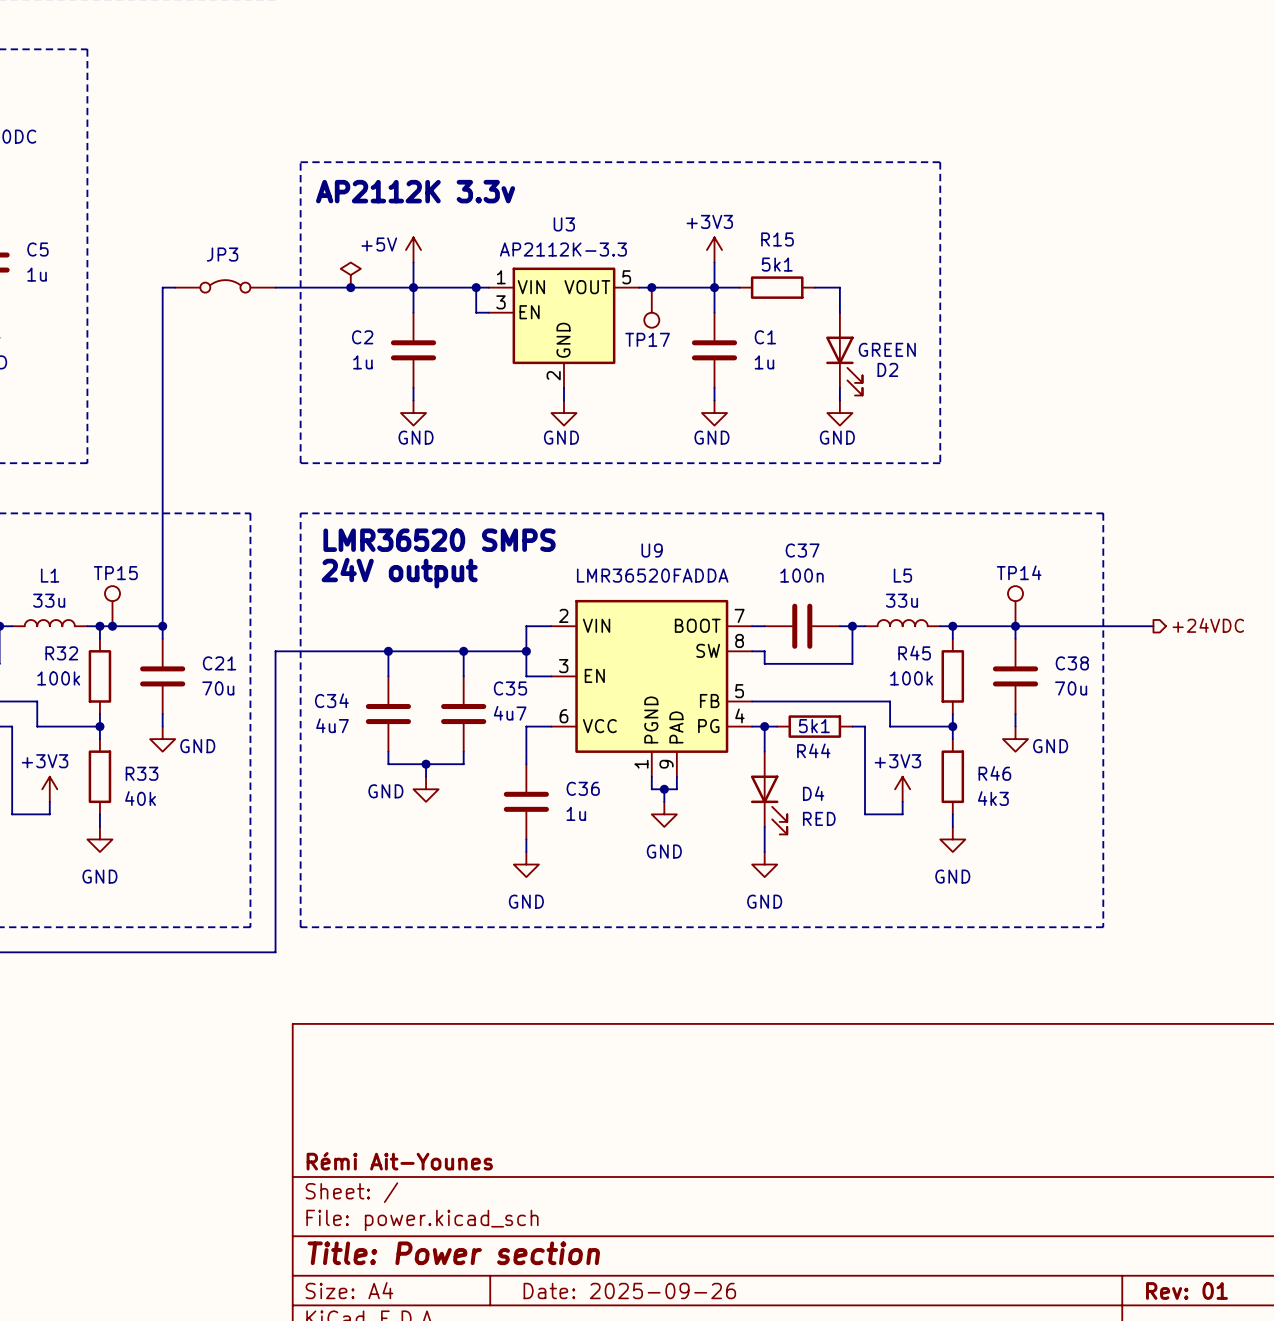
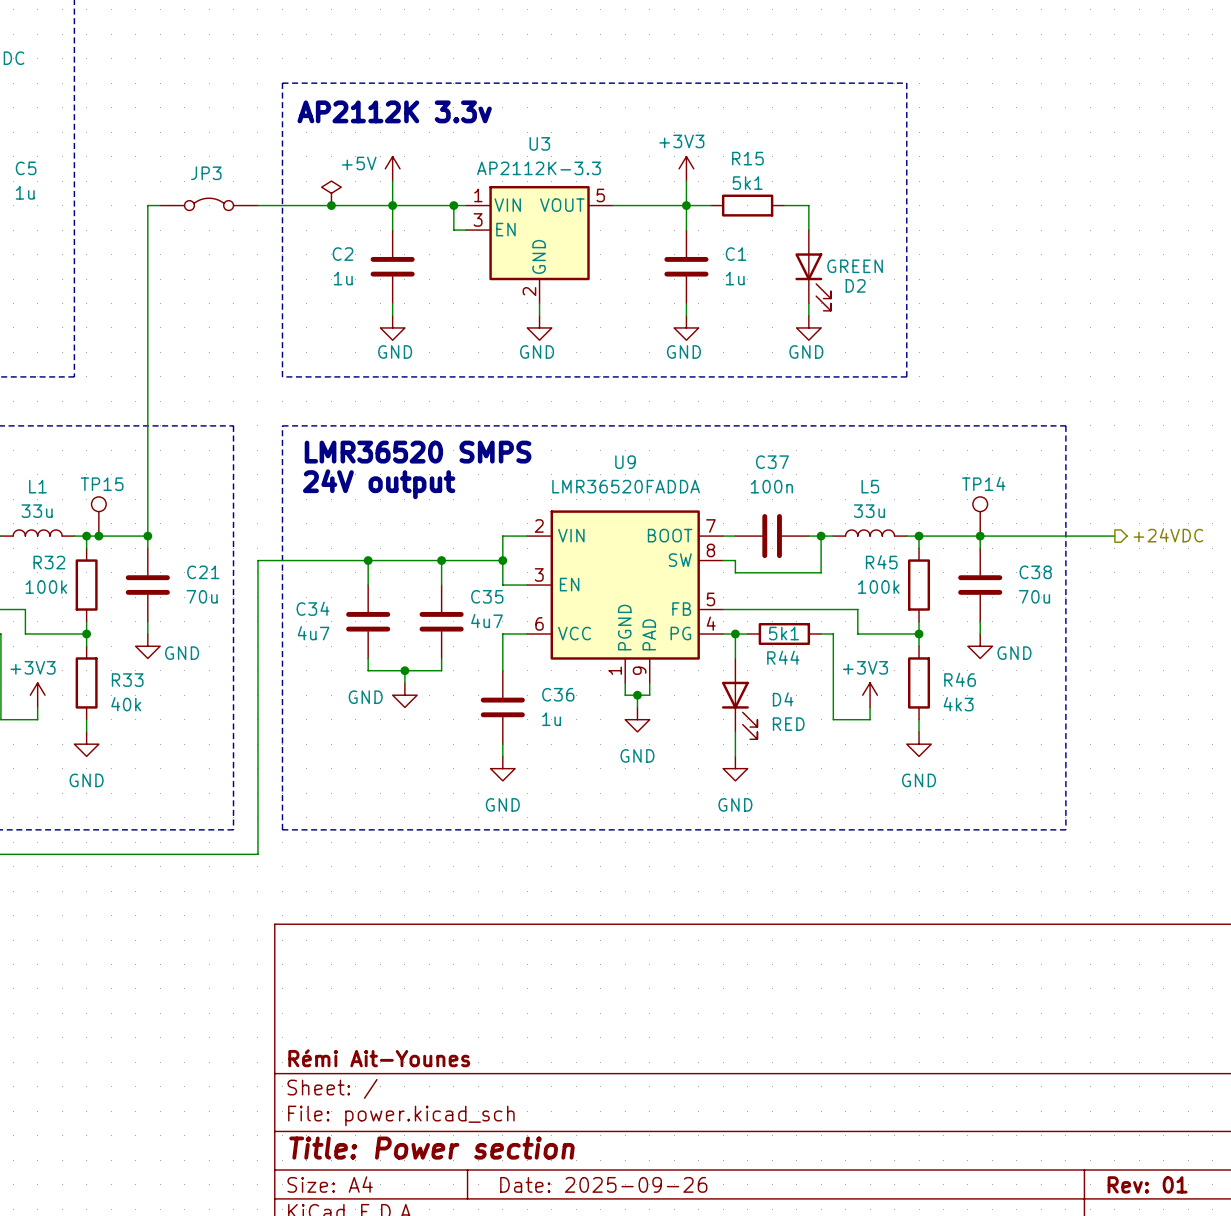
junction: (651, 287) -> none
TP17: (651, 307) -> none

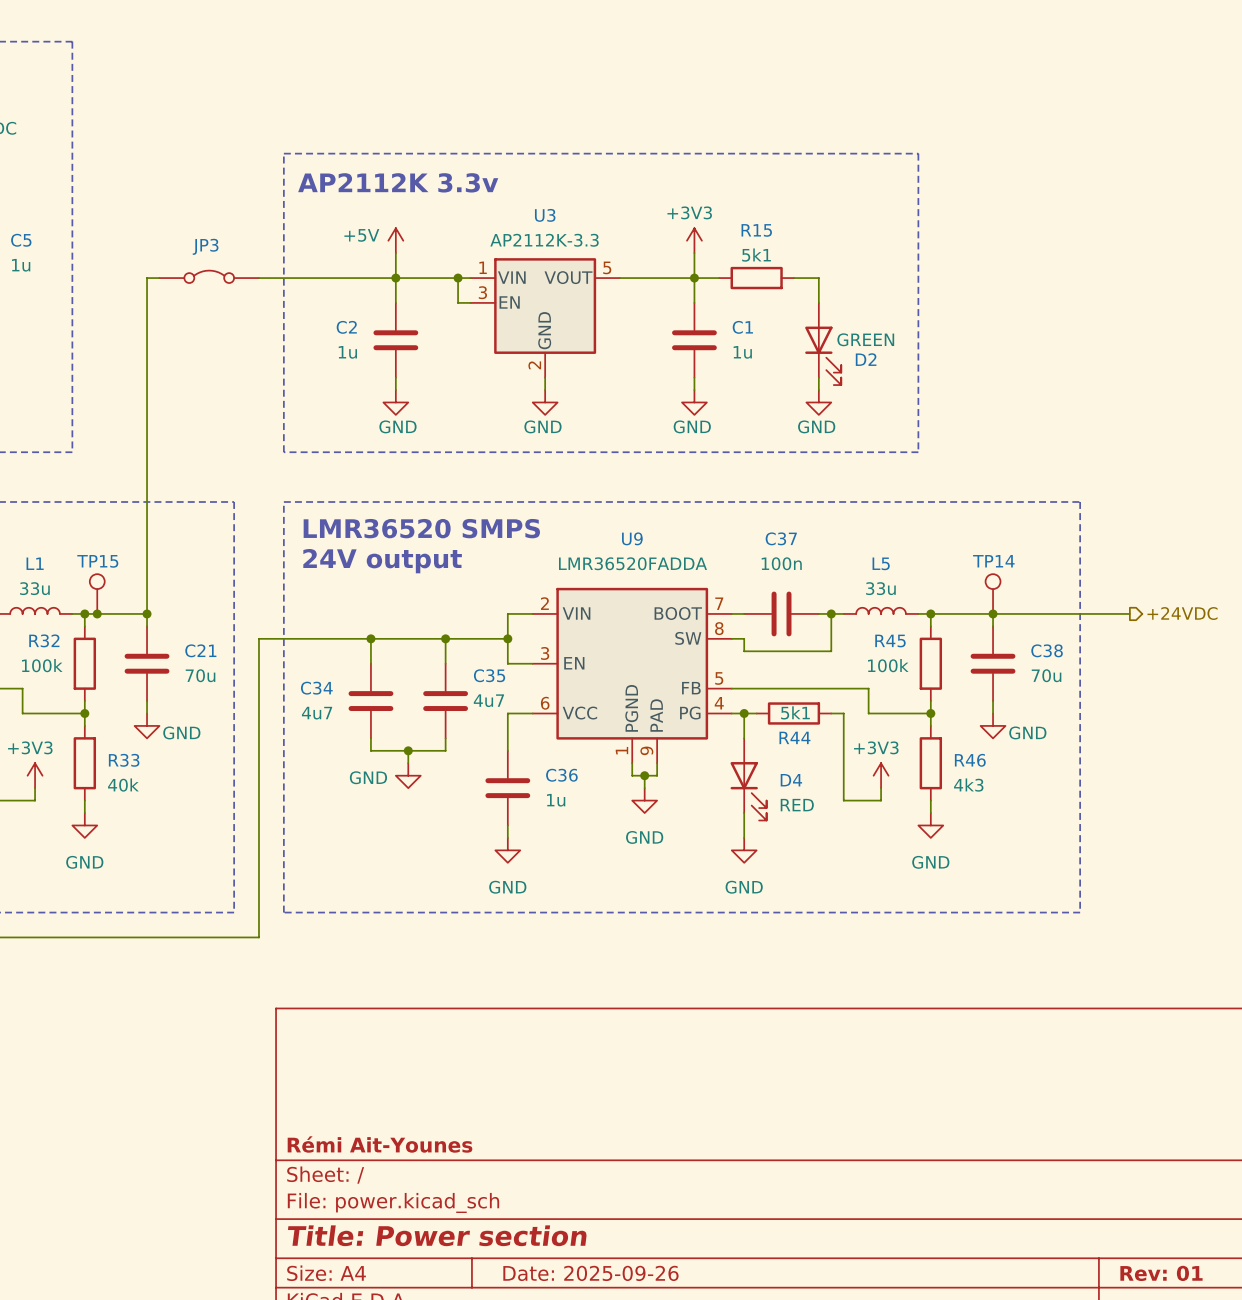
power symbol: (331, 193) -> none
junction: (331, 205) -> none

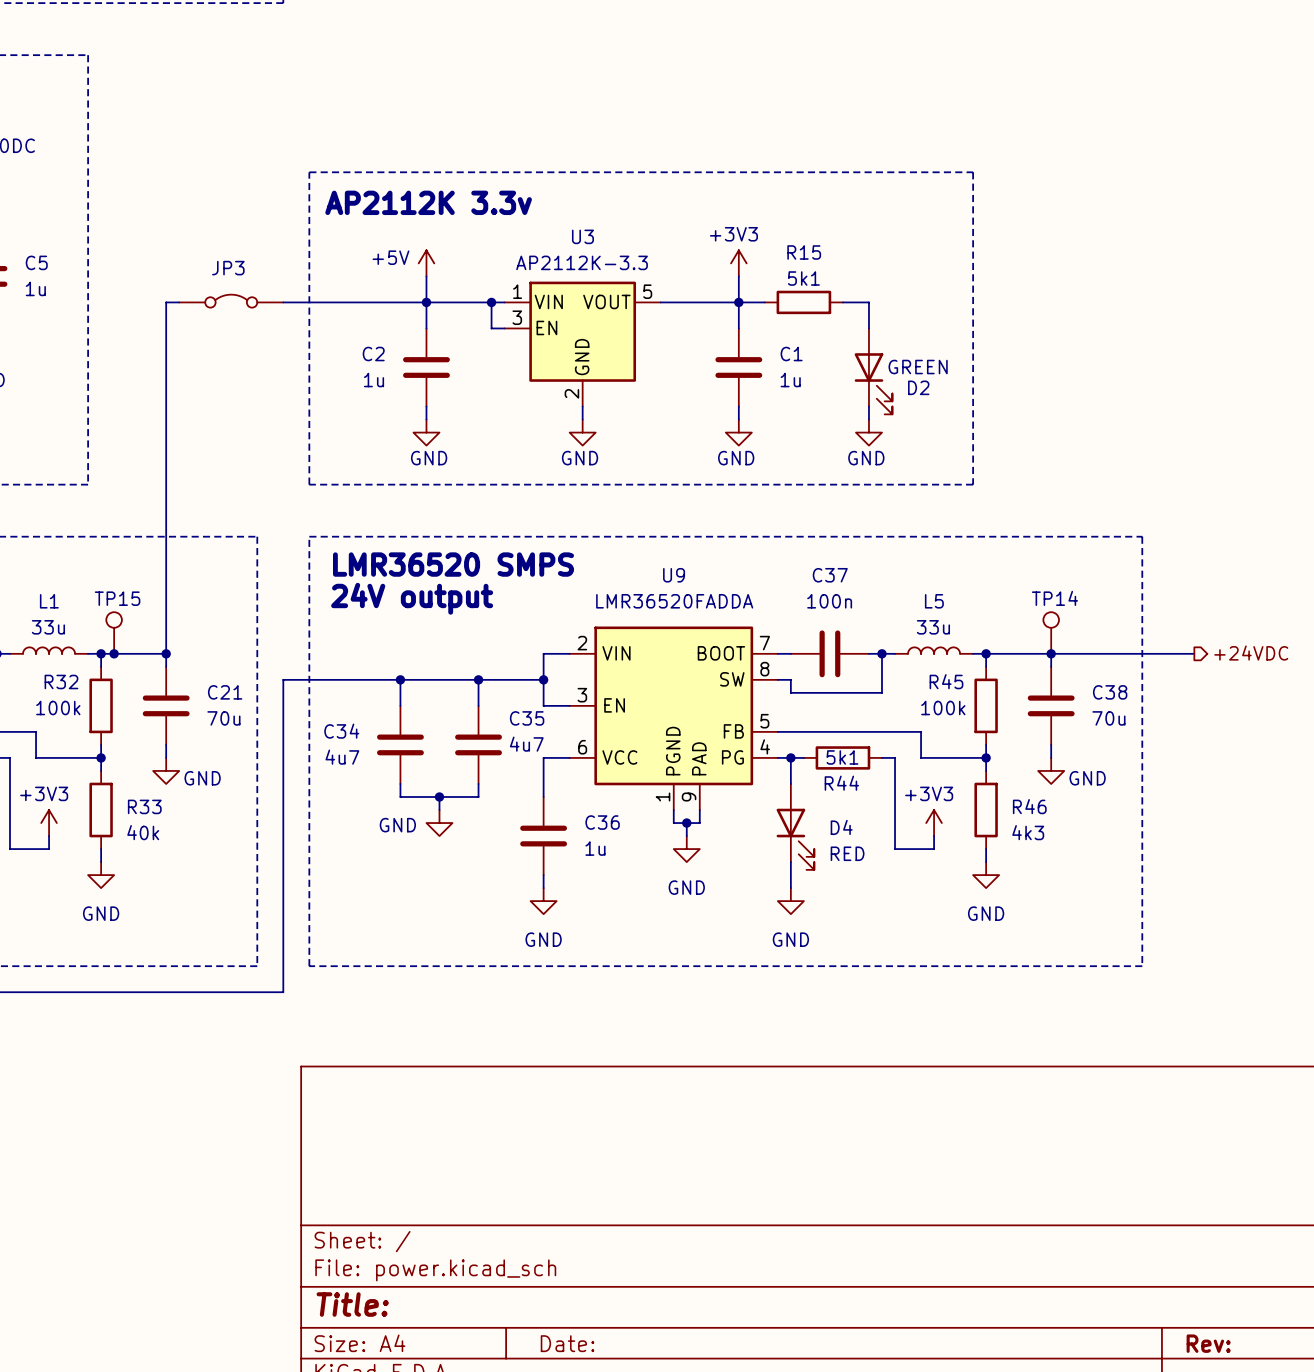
title block: Rémi Ait-Younes (380, 1144) -> none
title block: Title: Power section (437, 1235) -> Title: (352, 1304)
title block: Date: 2025-09-26 (590, 1273) -> Date: (567, 1343)
title block: Rev: 01 (1161, 1273) -> Rev: (1208, 1343)

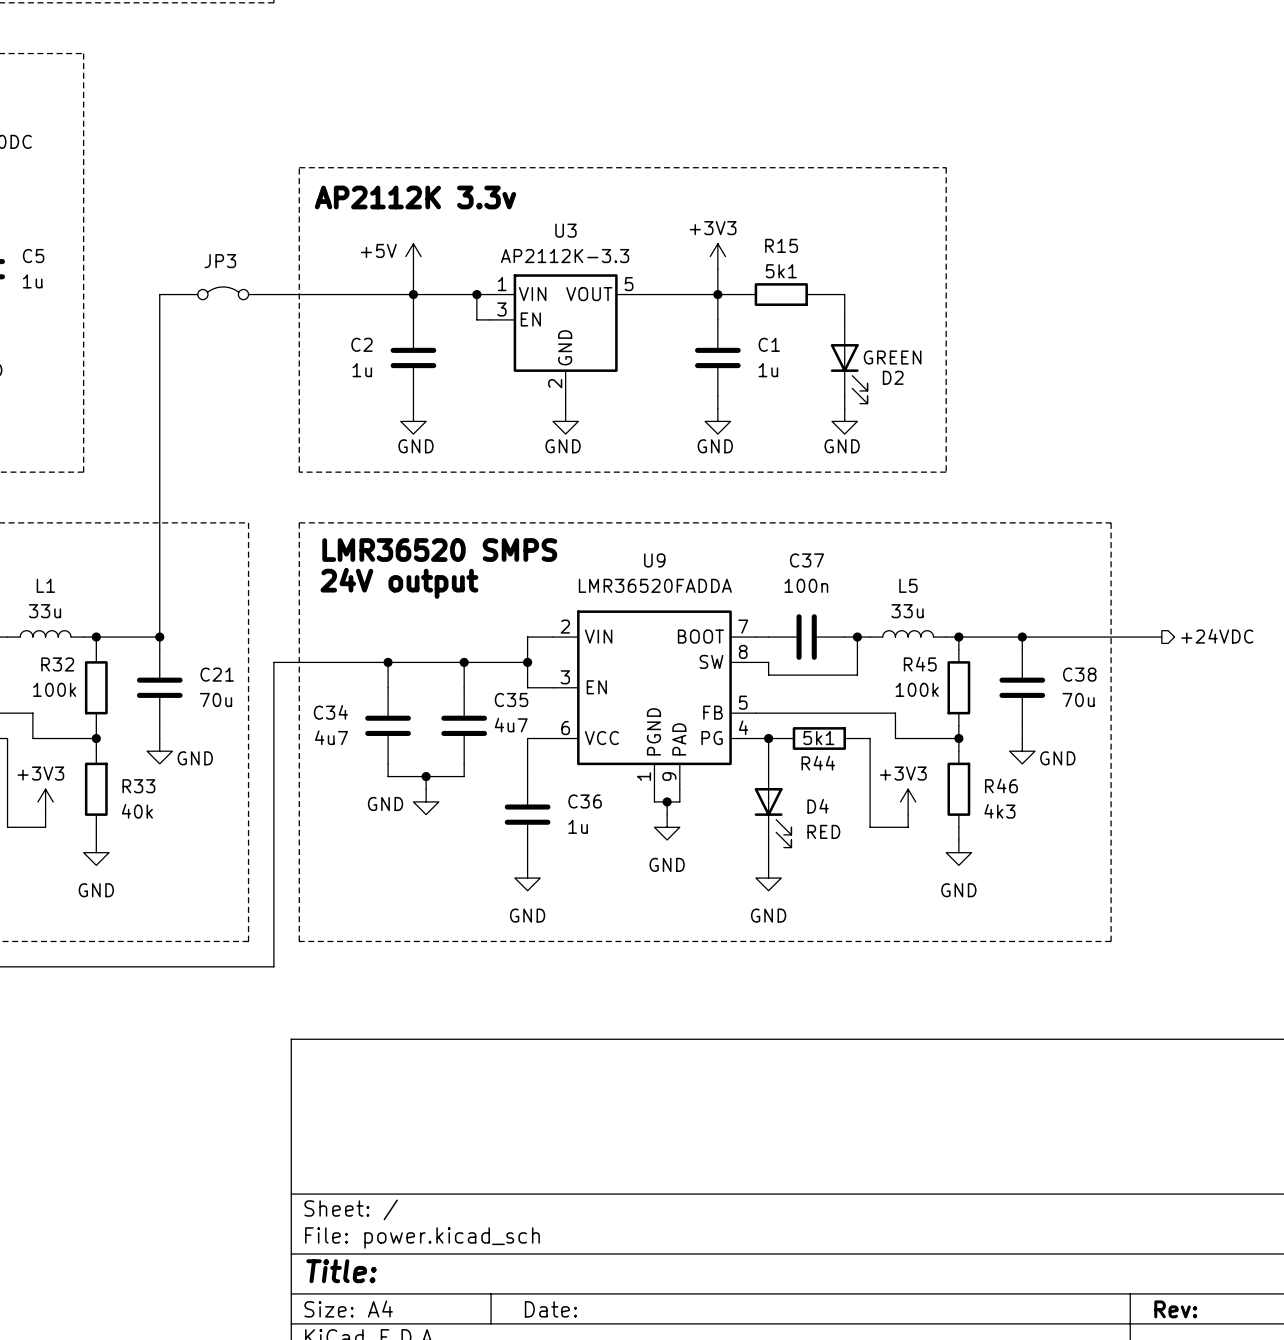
TP15: (114, 633) -> none
TP14: (1051, 633) -> none
junction: (114, 653) -> none

